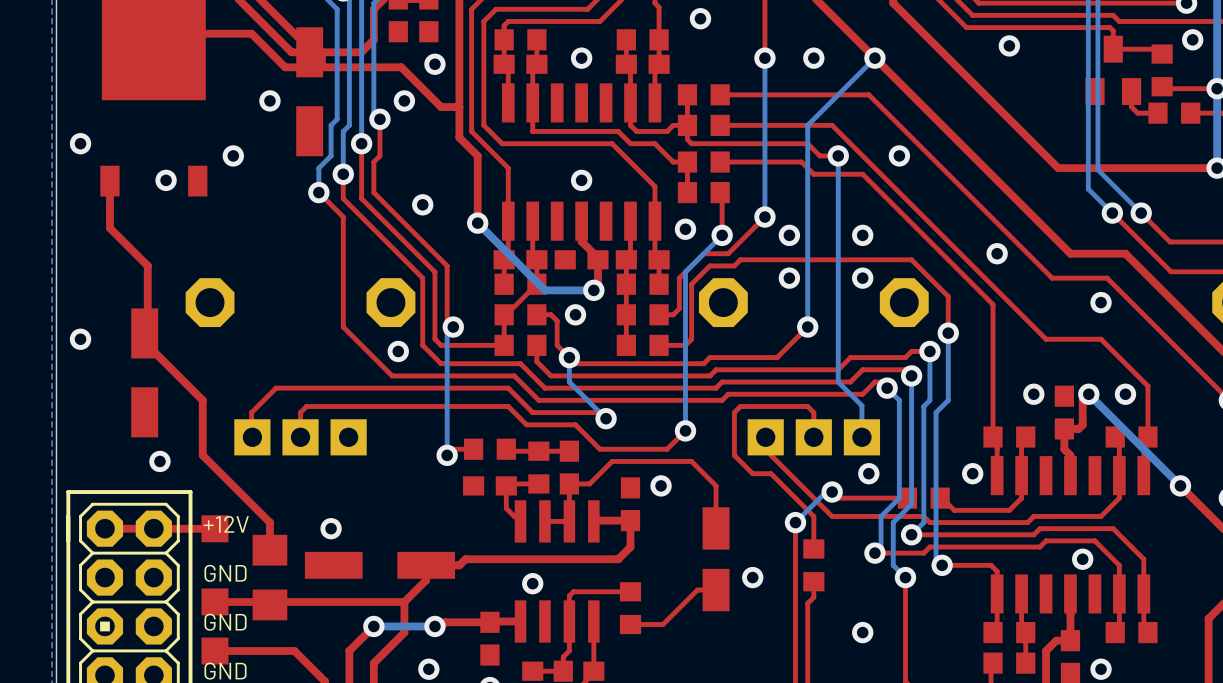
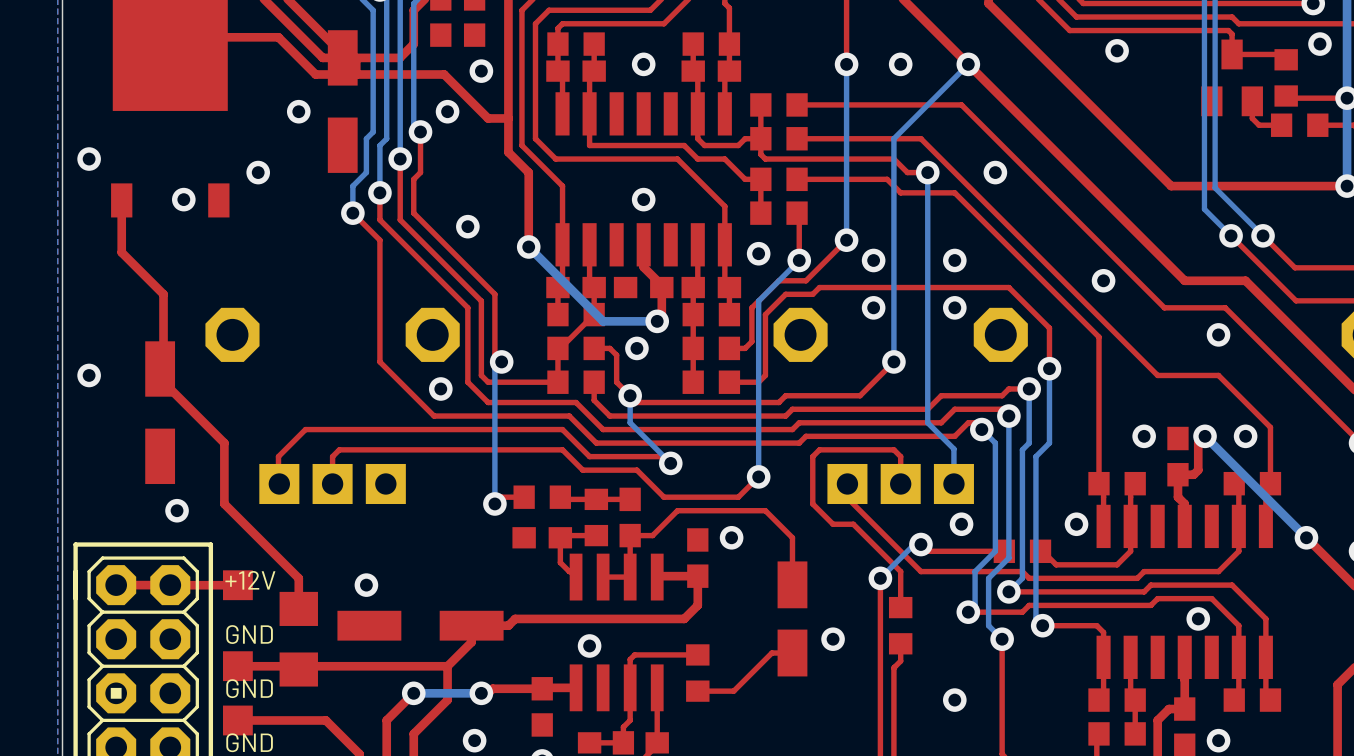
via: (700, 18) -> none

